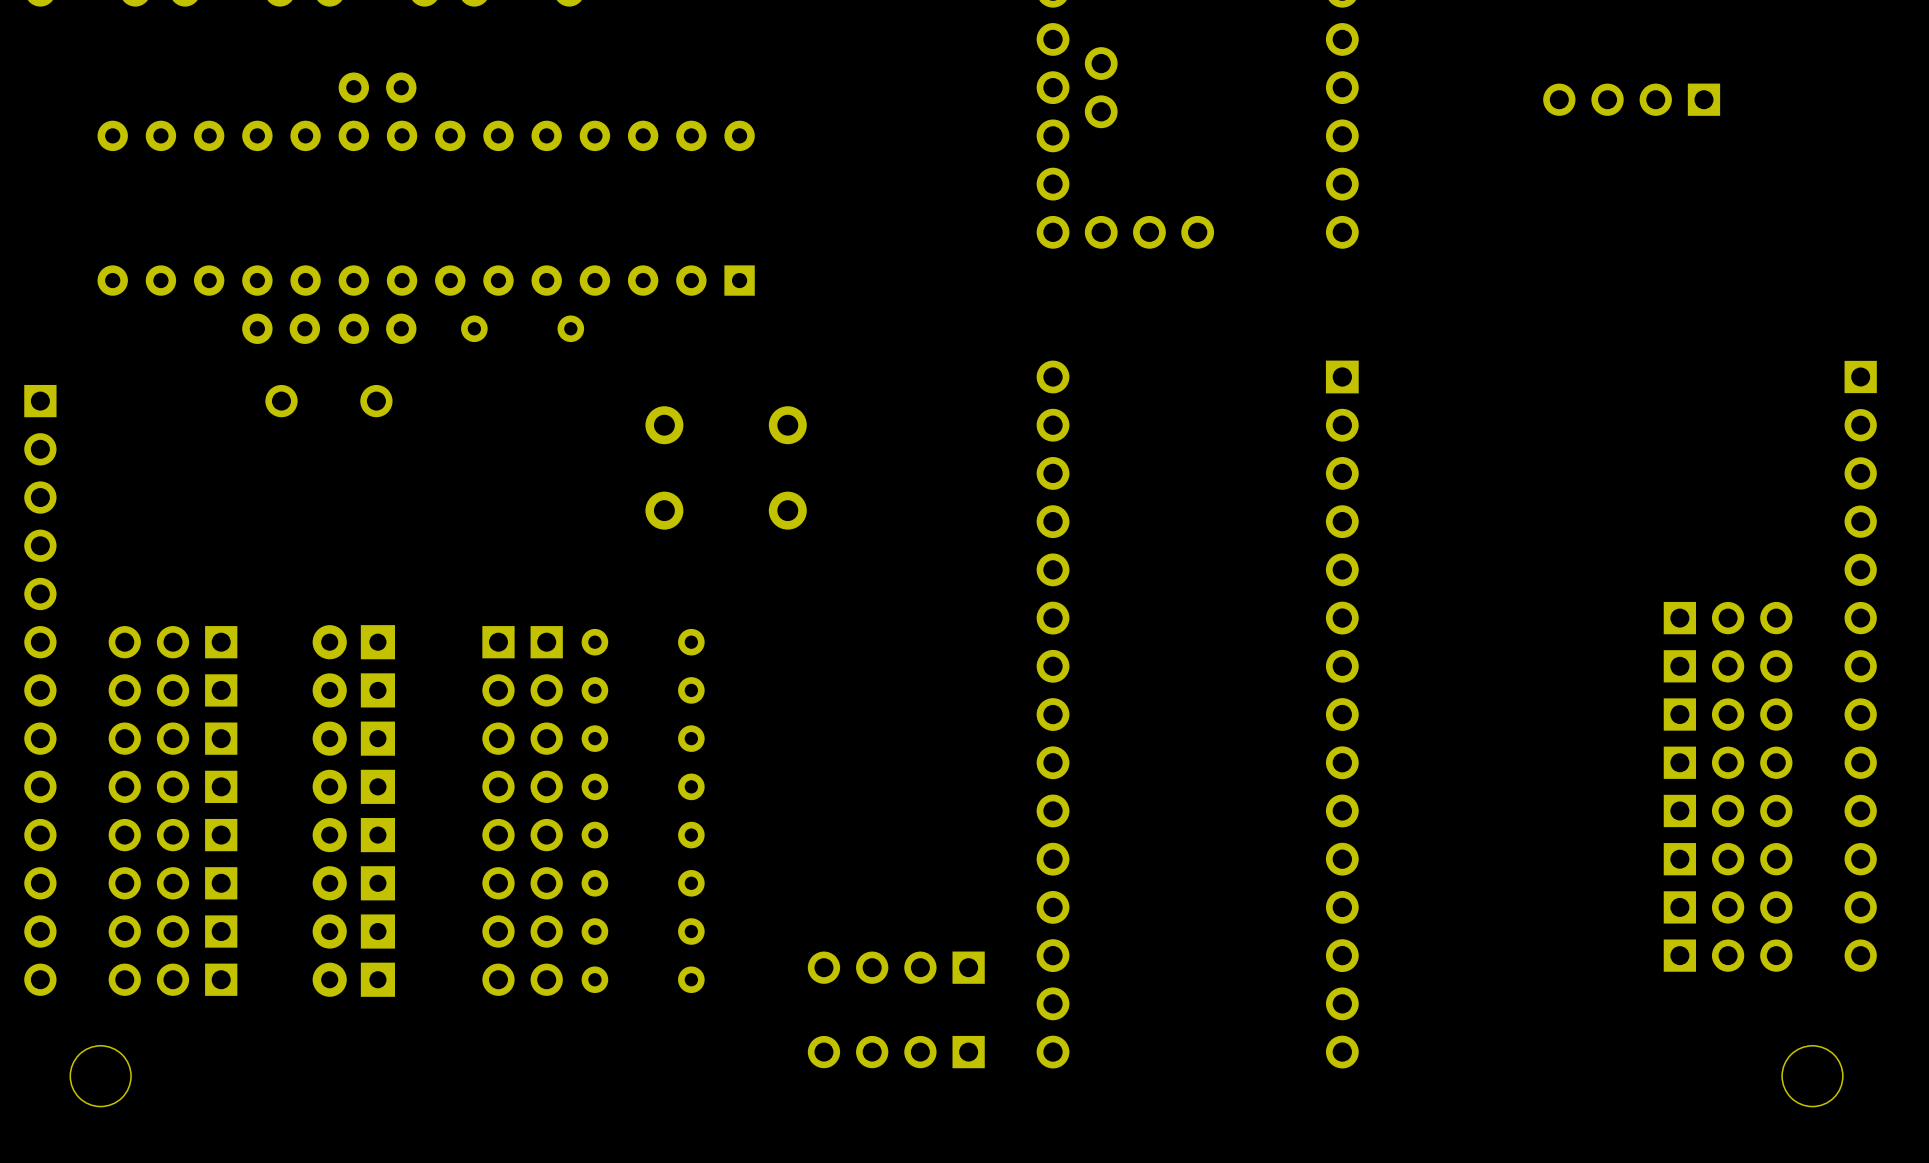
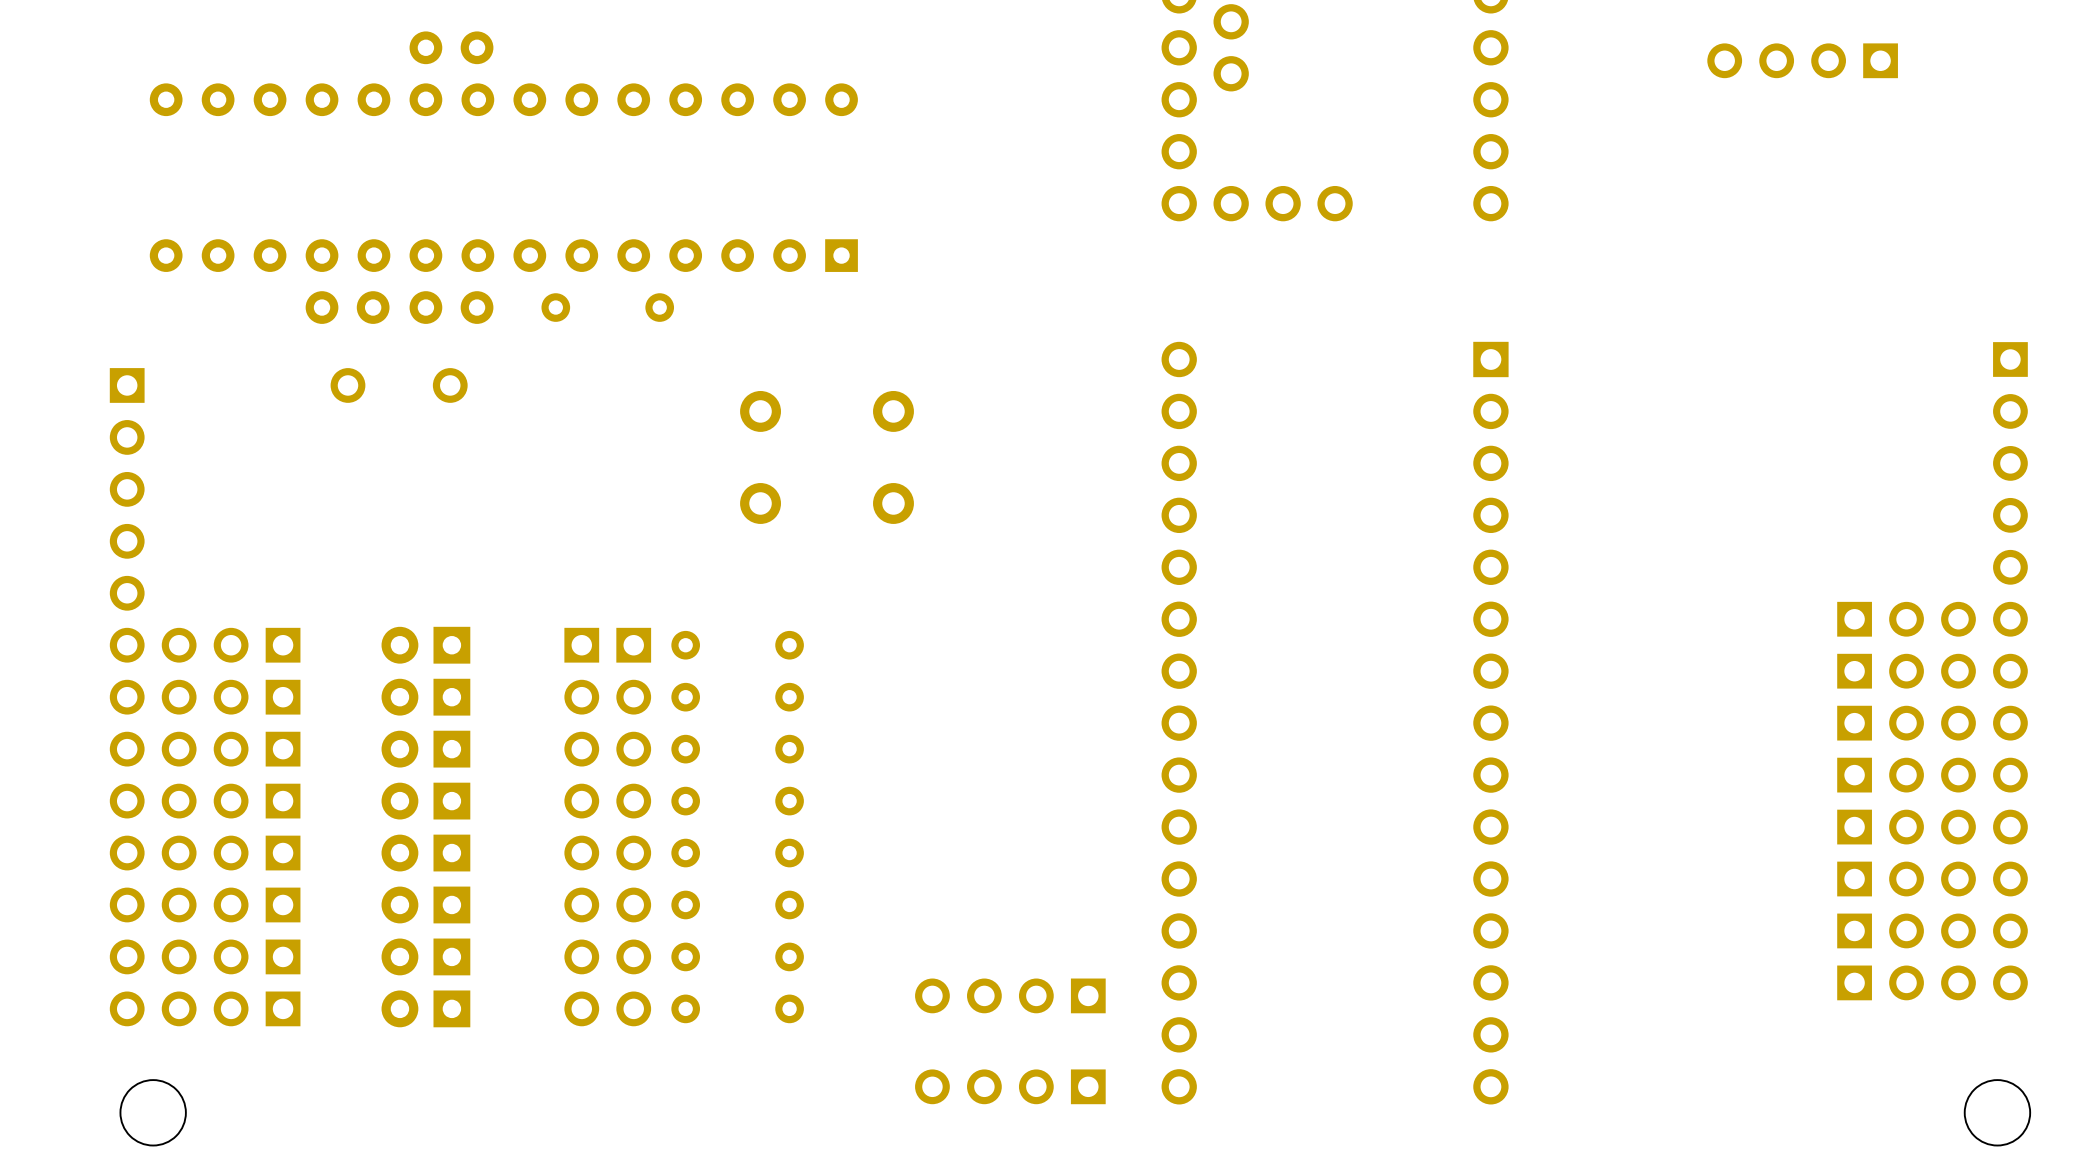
part position: (1860, 666) -> (2010, 671)
part position: (40, 690) -> (127, 697)

